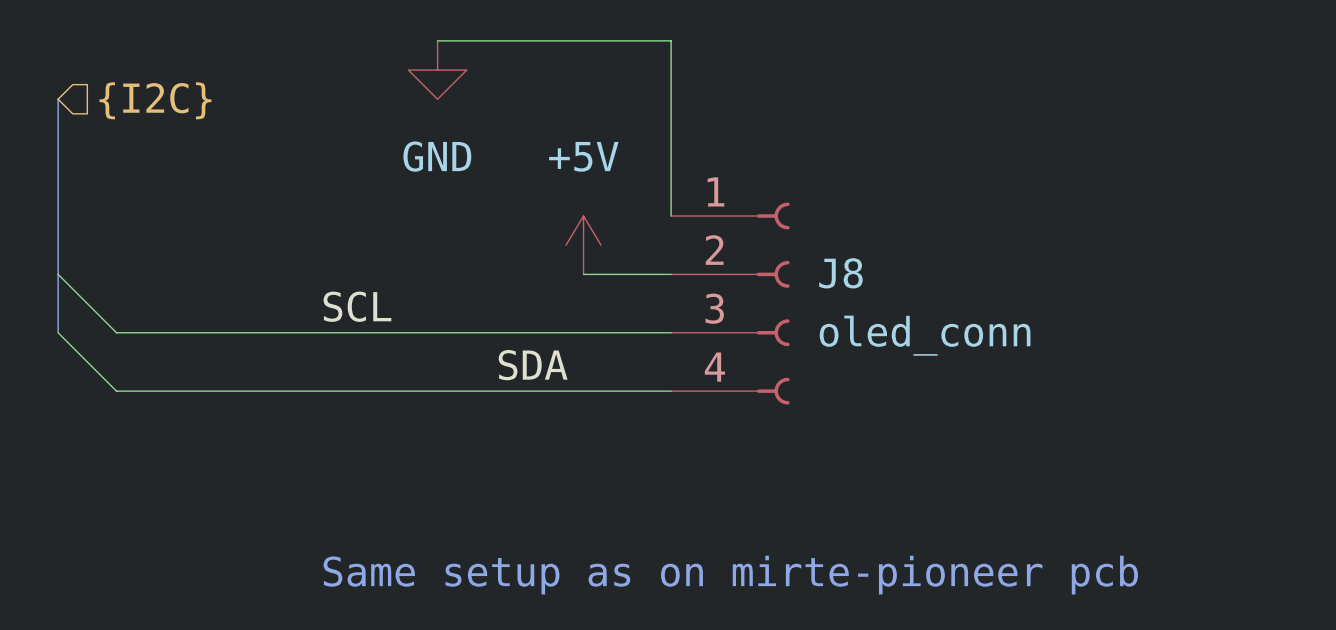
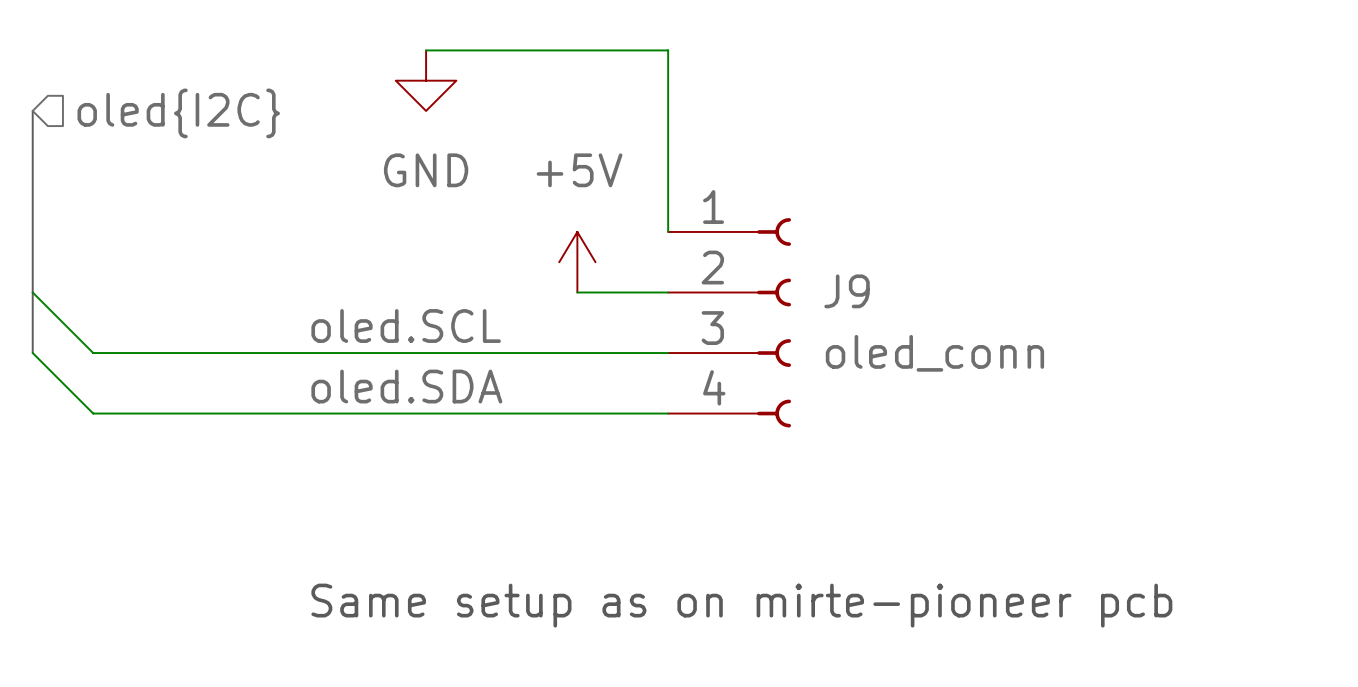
hierarchical label: {I2C} (155, 100) -> oled{I2C} (178, 113)
J8 name: J8 (840, 273) -> J9 (847, 291)
label: SCL (357, 306) -> oled.SCL (406, 326)
label: none -> oled.SDA (406, 386)
label: SDA (533, 365) -> none

